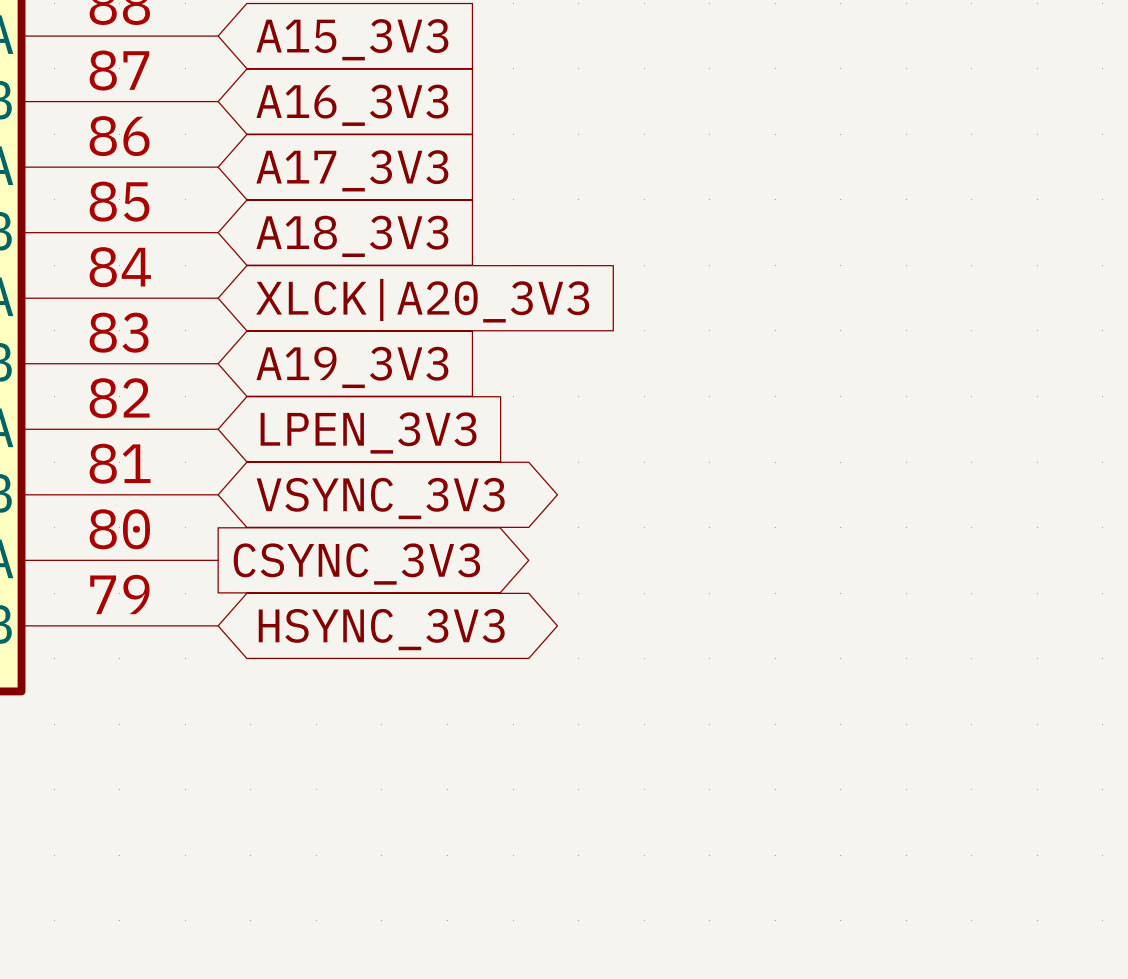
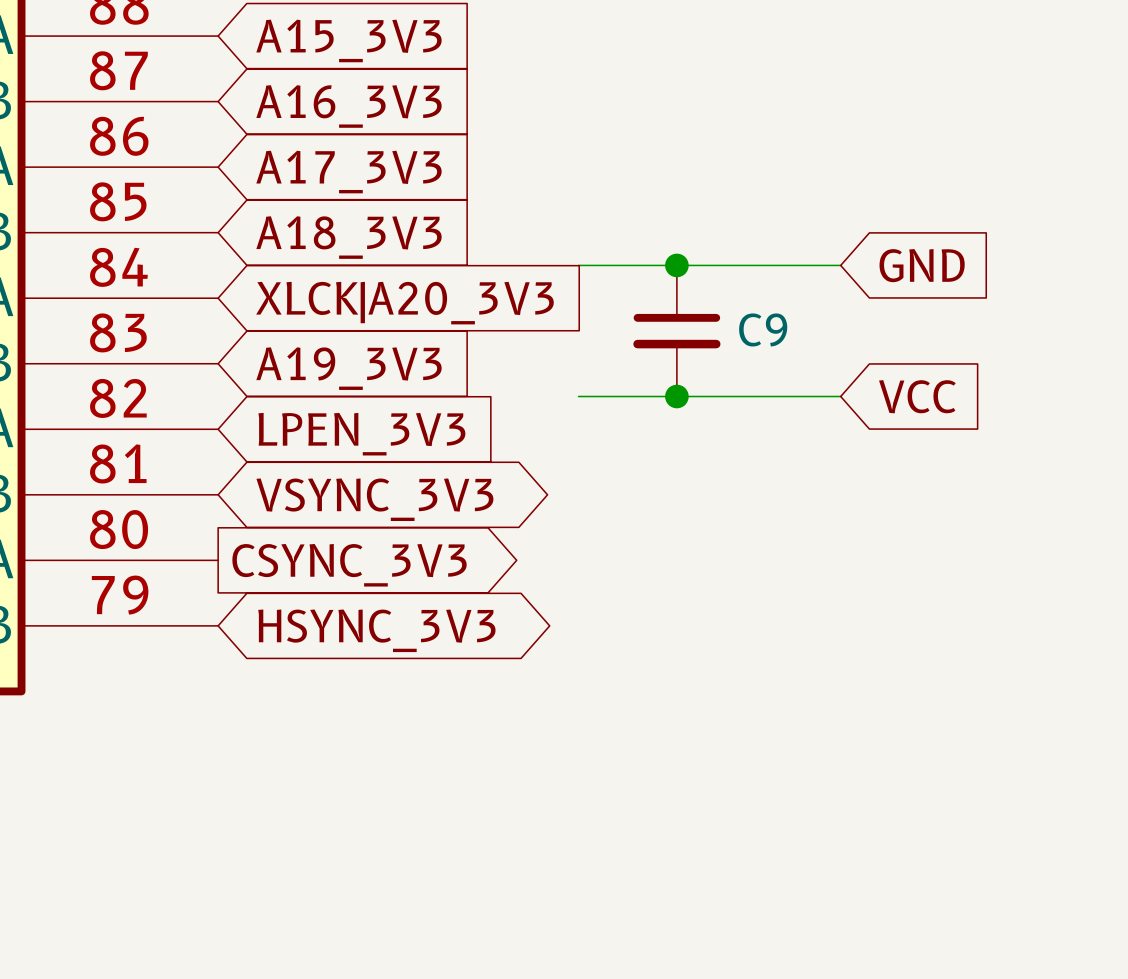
wire: none -> (578, 265) (840, 265)
junction: none -> (676, 265)
global label: none -> GND (922, 265)
C9: none -> (676, 330)
wire: none -> (578, 396) (840, 396)
junction: none -> (676, 396)
global label: none -> VCC (917, 396)

